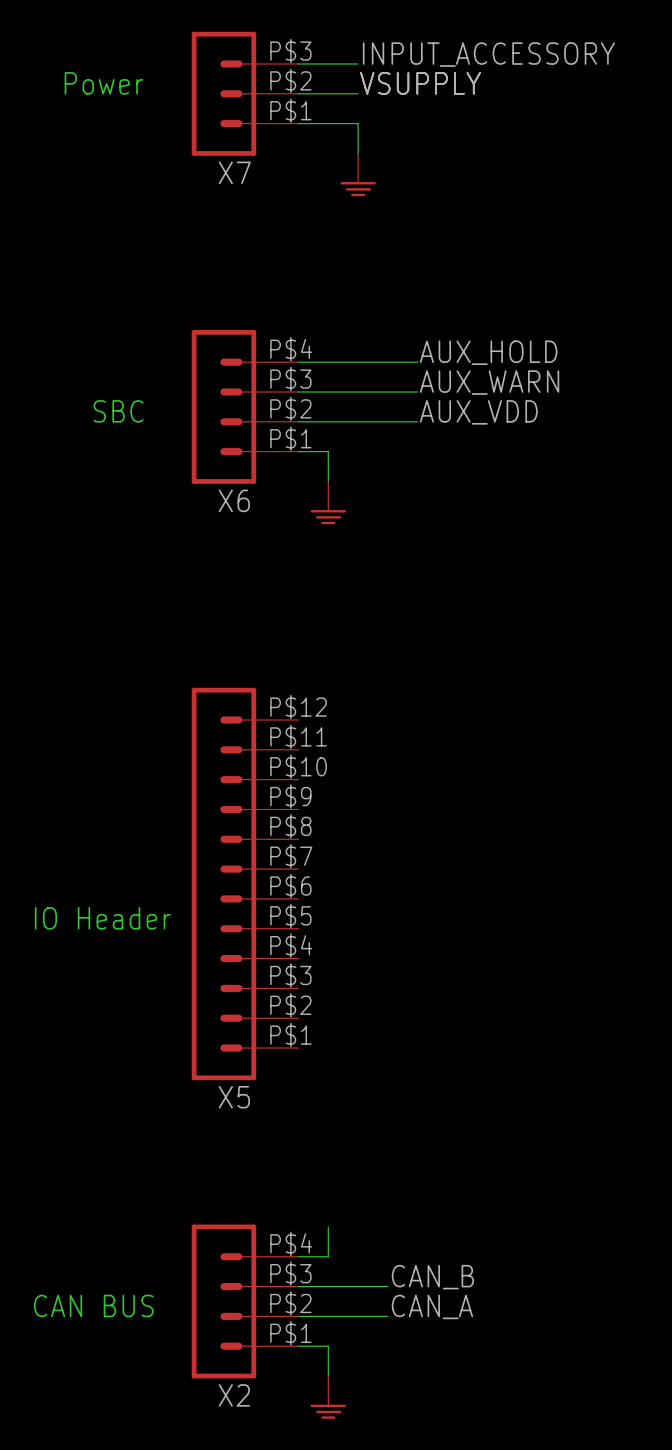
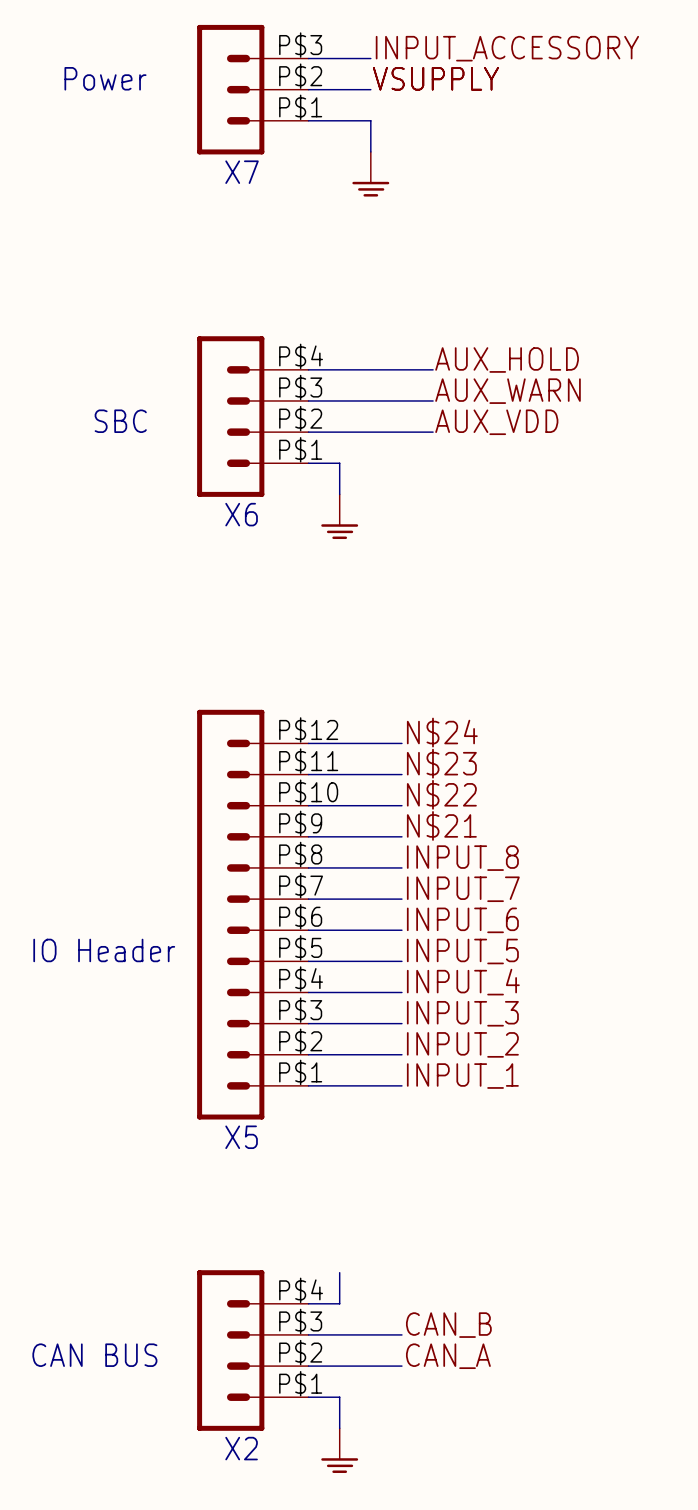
label: none -> N$24 (442, 732)
wire: none -> (308, 743) (401, 743)
label: none -> N$23 (441, 763)
wire: none -> (308, 774) (401, 774)
label: none -> N$22 (441, 794)
wire: none -> (308, 805) (401, 805)
label: none -> N$21 (441, 825)
wire: none -> (308, 836) (401, 836)
label: none -> INPUT_8 (462, 858)
wire: none -> (308, 867) (401, 867)
label: none -> INPUT_7 (463, 889)
wire: none -> (308, 899) (401, 899)
label: none -> INPUT_6 (462, 920)
wire: none -> (308, 930) (401, 930)
label: none -> INPUT_5 (462, 951)
wire: none -> (308, 961) (401, 961)
label: none -> INPUT_4 (463, 982)
wire: none -> (308, 992) (401, 992)
label: none -> INPUT_3 (462, 1013)
wire: none -> (308, 1023) (401, 1023)
label: none -> INPUT_2 (462, 1044)
wire: none -> (308, 1054) (401, 1054)
label: none -> INPUT_1 (462, 1076)
wire: none -> (308, 1085) (401, 1085)

